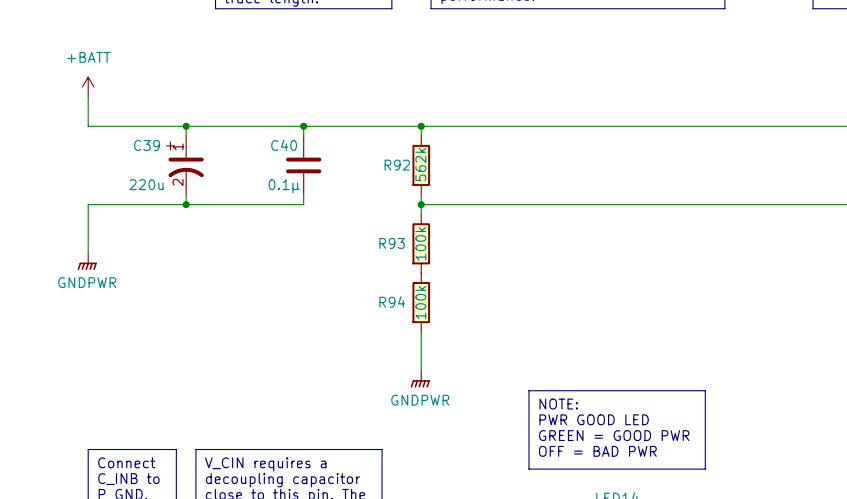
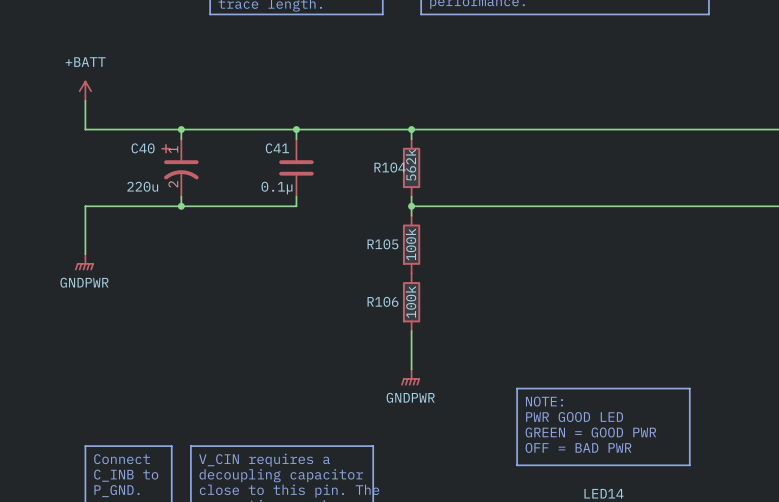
C39 name: C39 (146, 145) -> C40 (143, 148)
C40 name: C40 (284, 145) -> C41 (277, 148)
R92 name: R92 (397, 165) -> R104 (390, 167)
R93 name: R93 (392, 243) -> R105 (382, 244)
R94 name: R94 (392, 301) -> R106 (382, 301)

